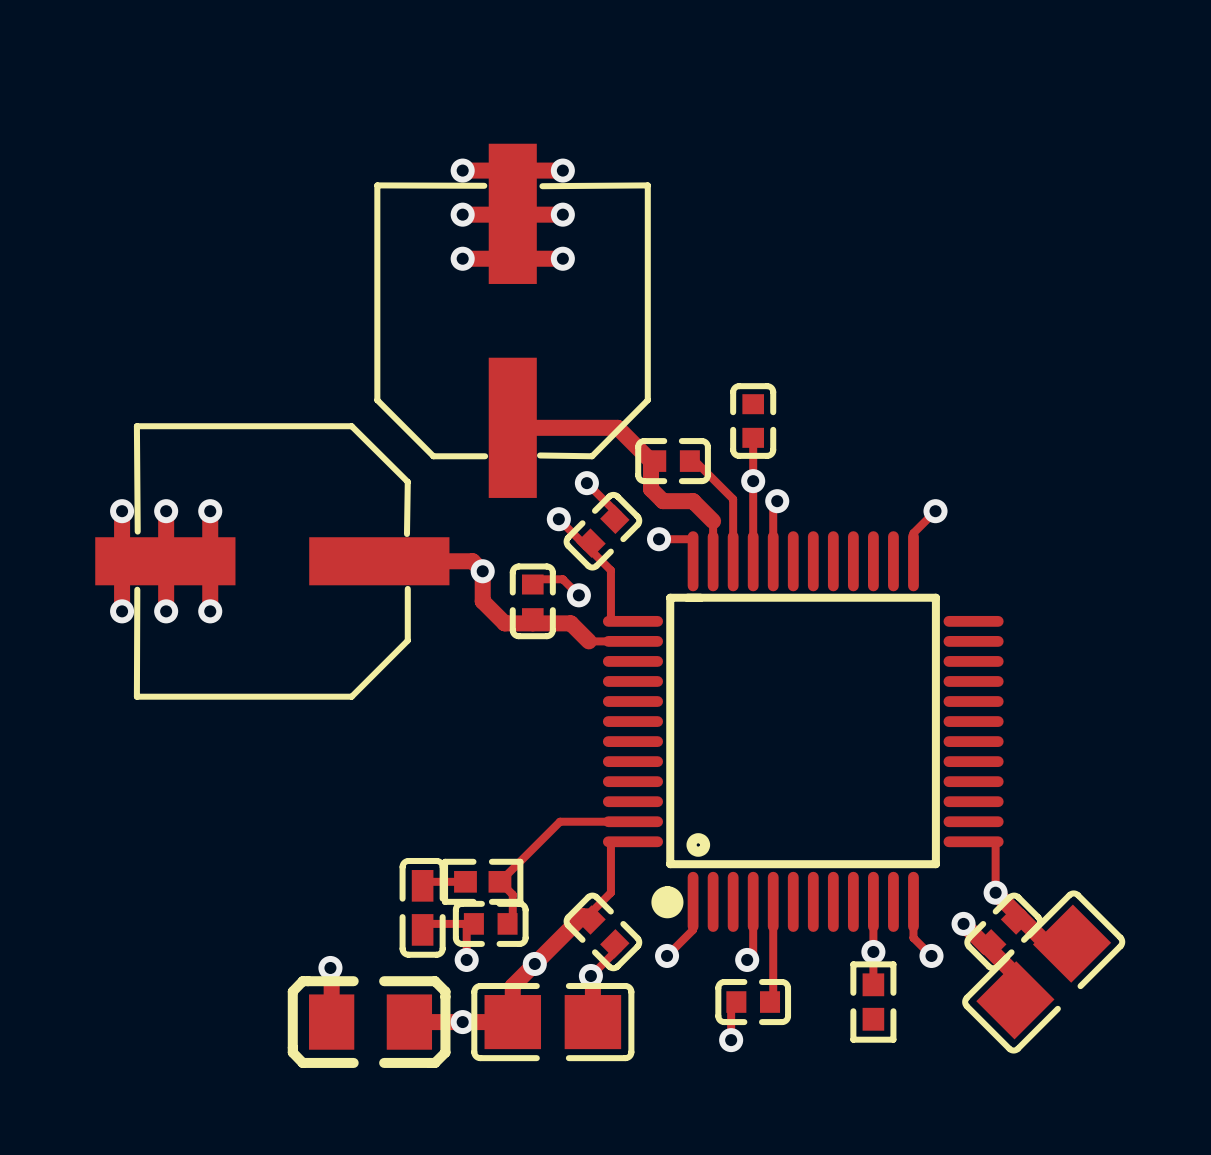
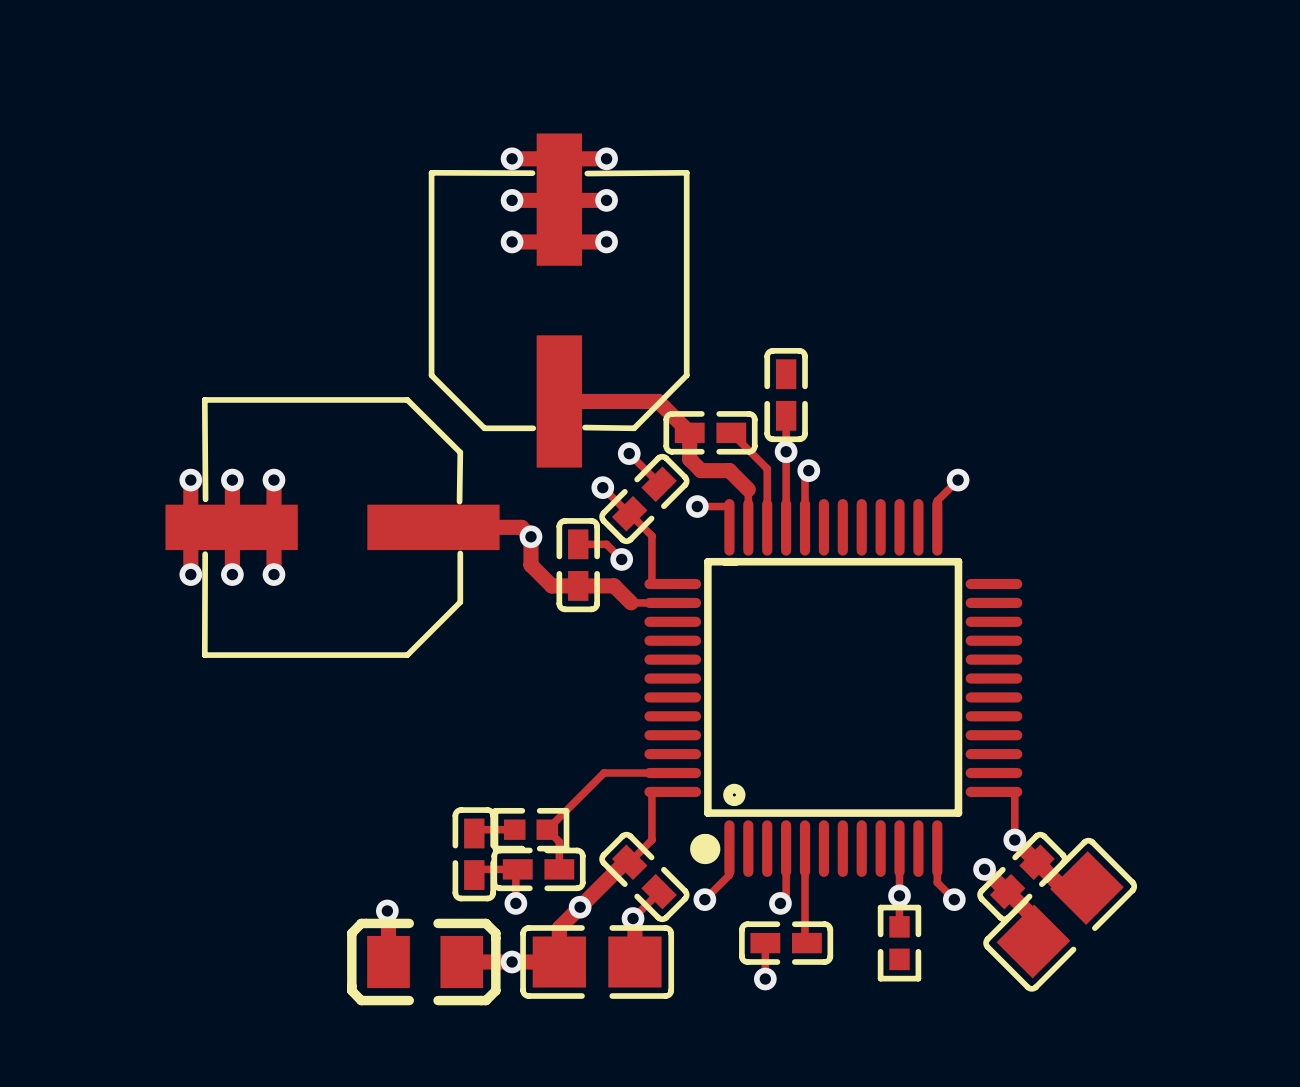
part footprint: [730, 383, 777, 459] -> [764, 347, 808, 443]
part footprint: [635, 438, 711, 485] -> [663, 411, 758, 455]
part footprint: [563, 491, 643, 571] -> [599, 453, 690, 545]
part footprint: [509, 563, 556, 640] -> [556, 518, 600, 613]
part footprint: [563, 892, 643, 972] -> [599, 831, 690, 923]
part footprint: [964, 892, 1043, 972] -> [977, 831, 1068, 923]
part footprint: [452, 900, 529, 947] -> [491, 847, 586, 892]
part footprint: [715, 979, 792, 1026] -> [739, 921, 834, 965]

